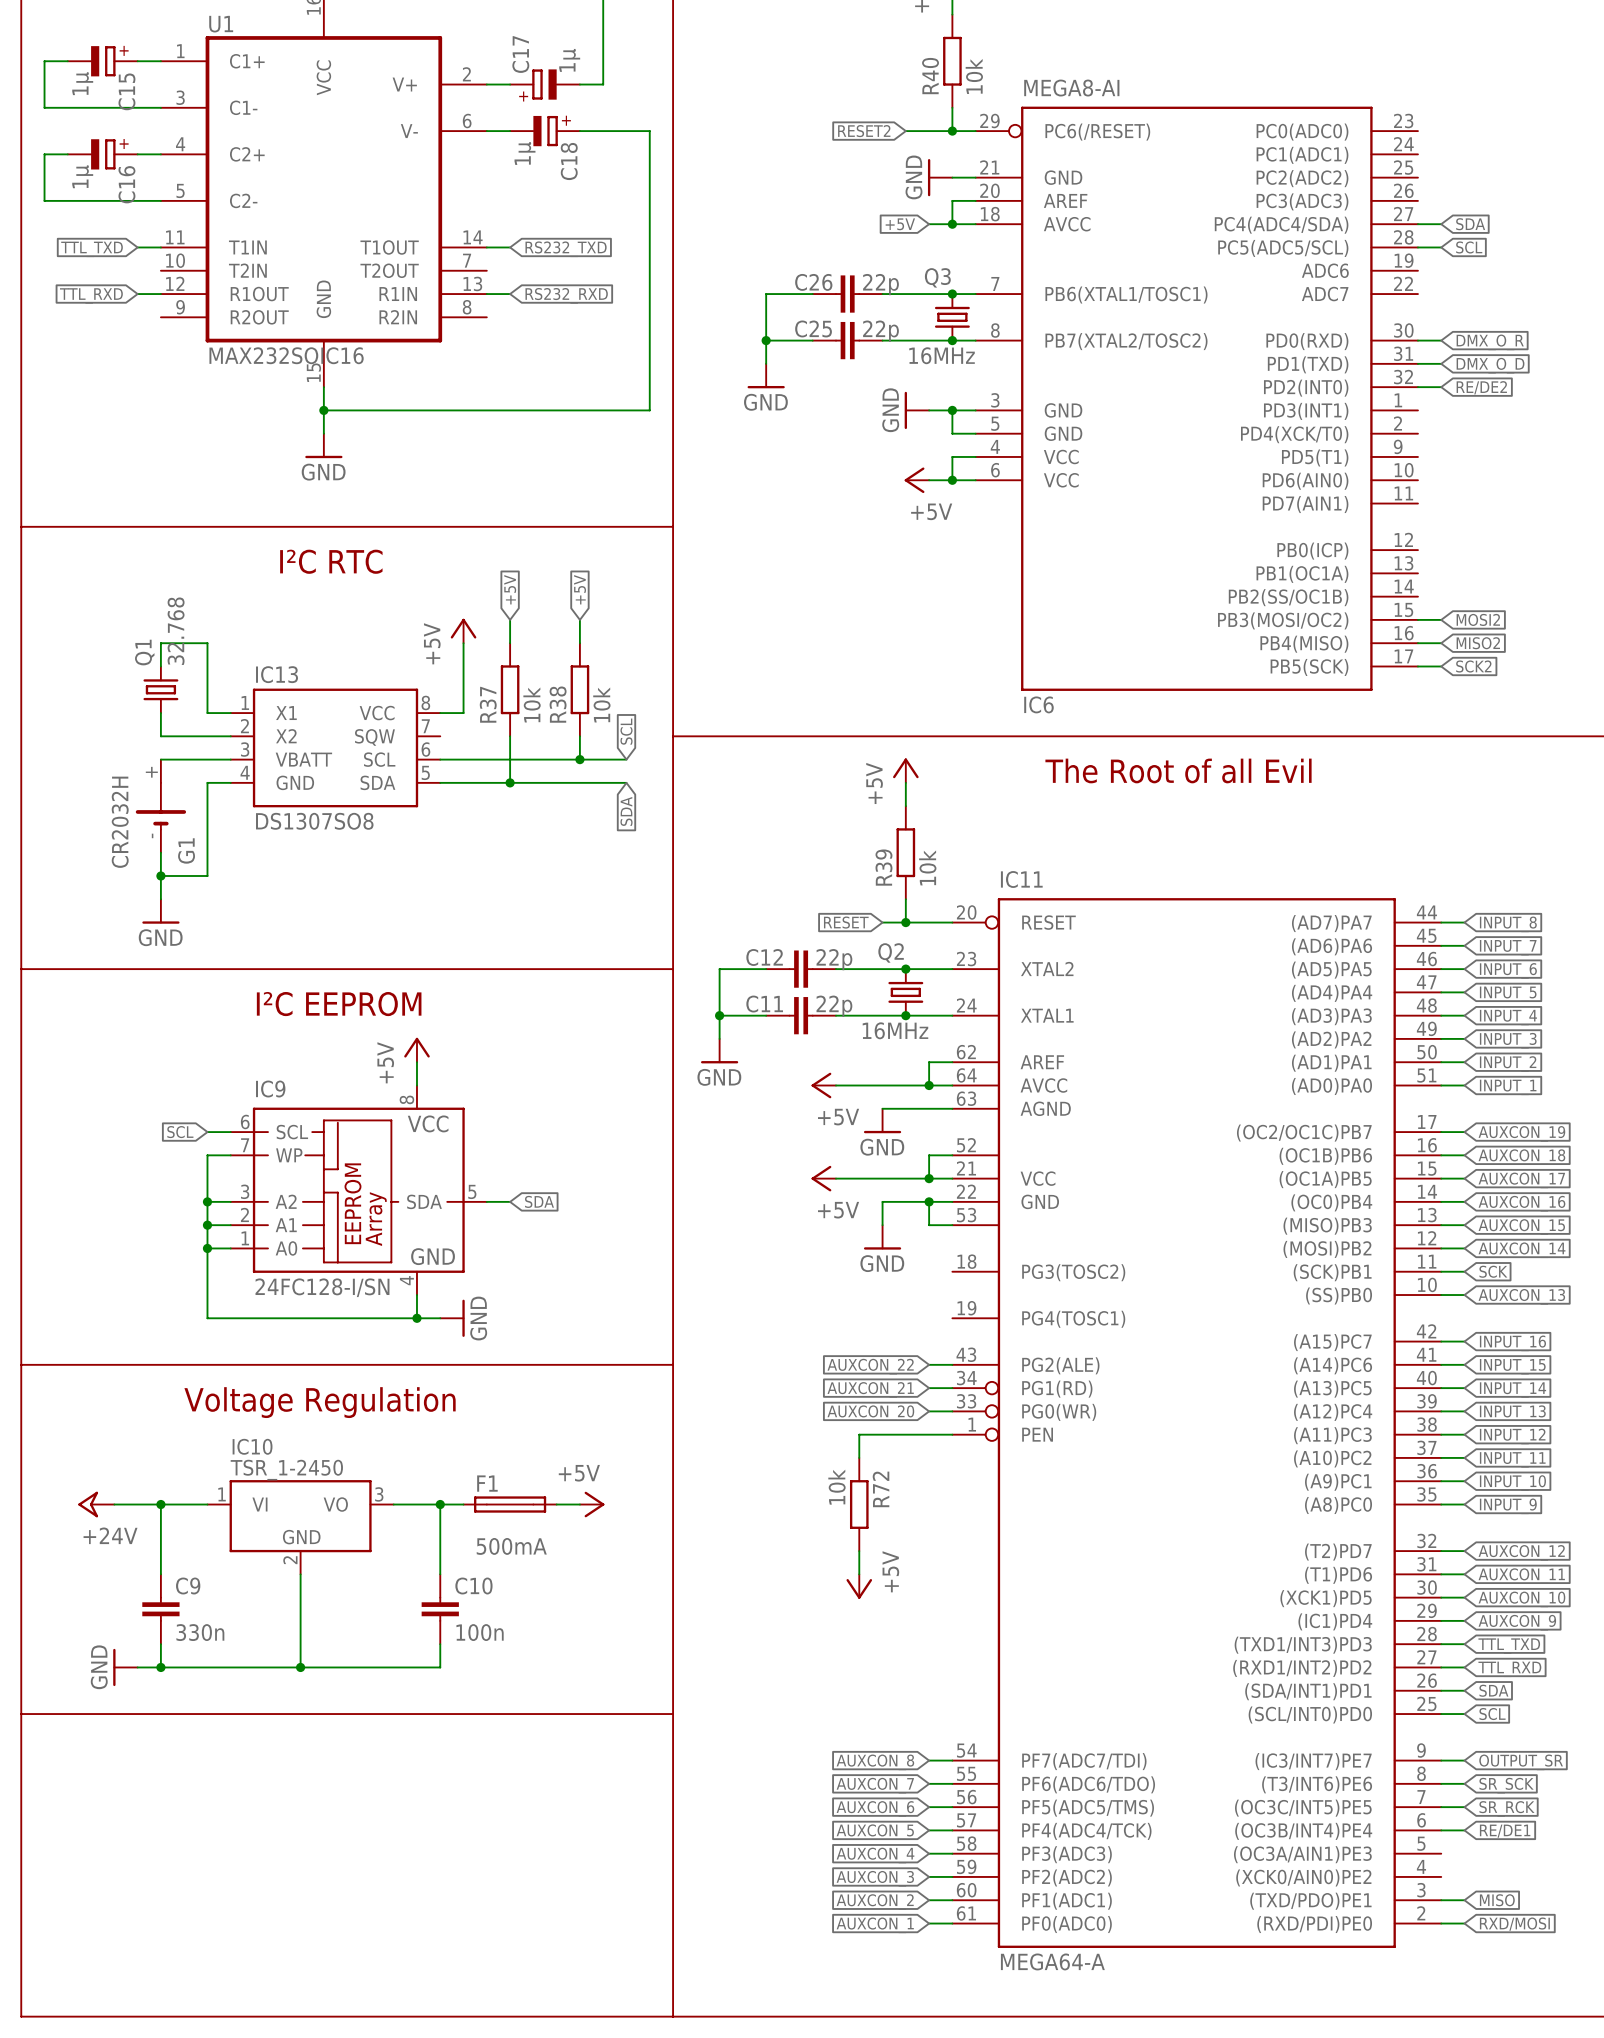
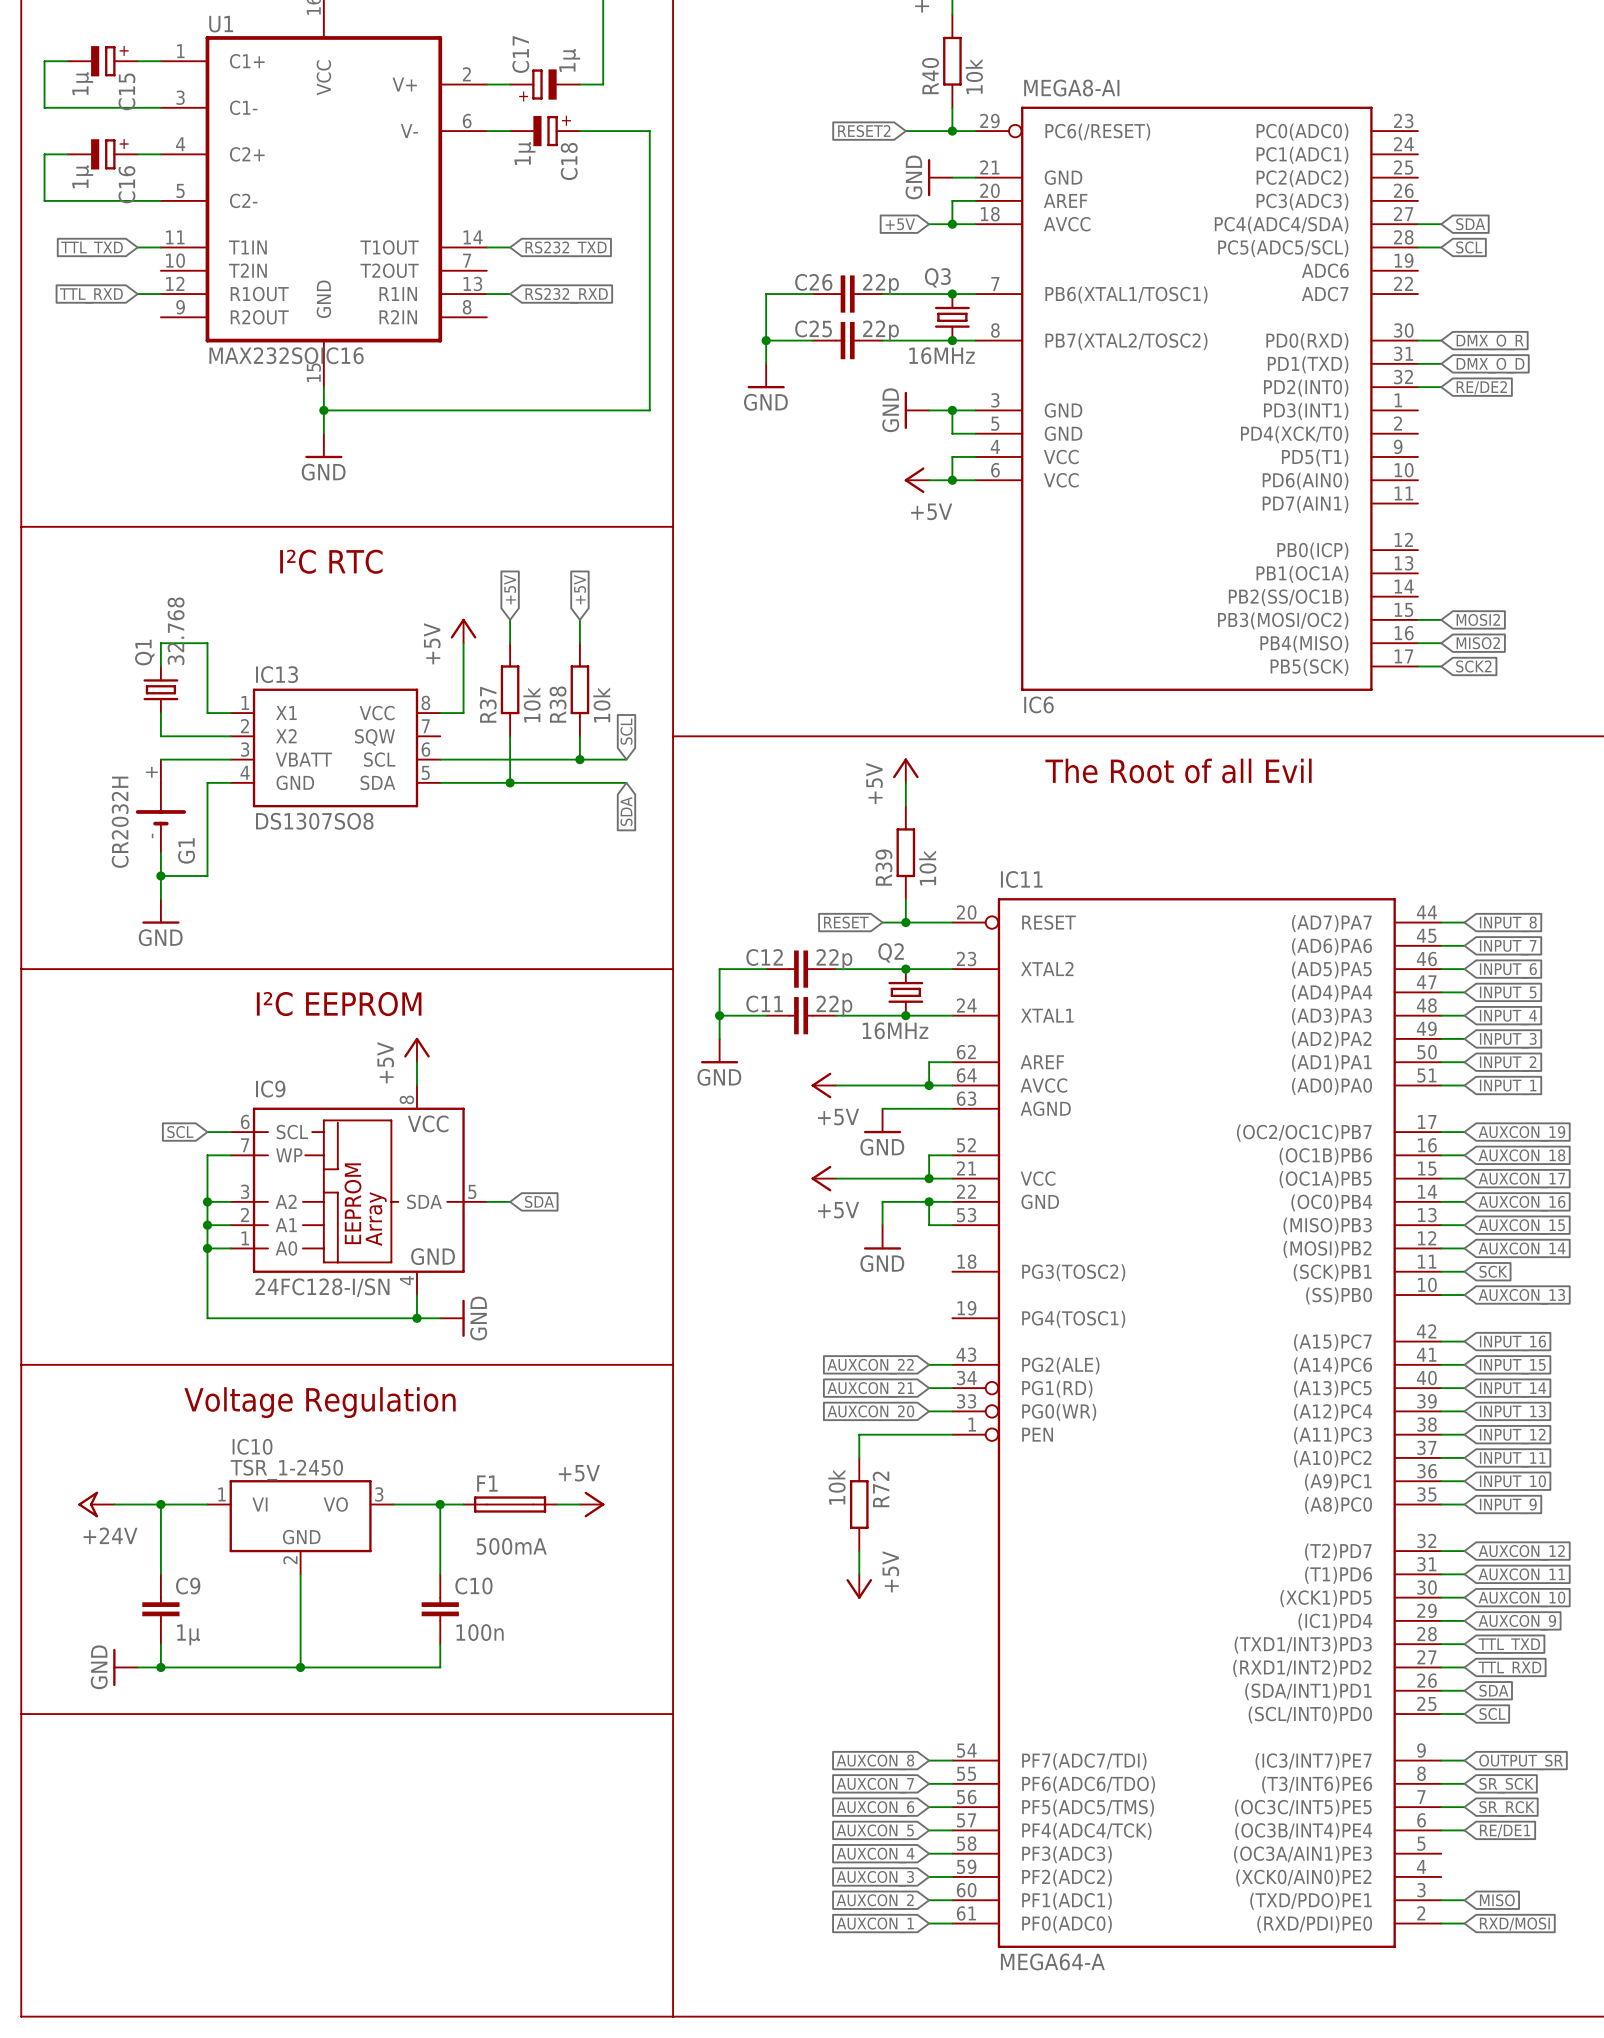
C9 value: 330n (200, 1632) -> 1µ (188, 1634)

